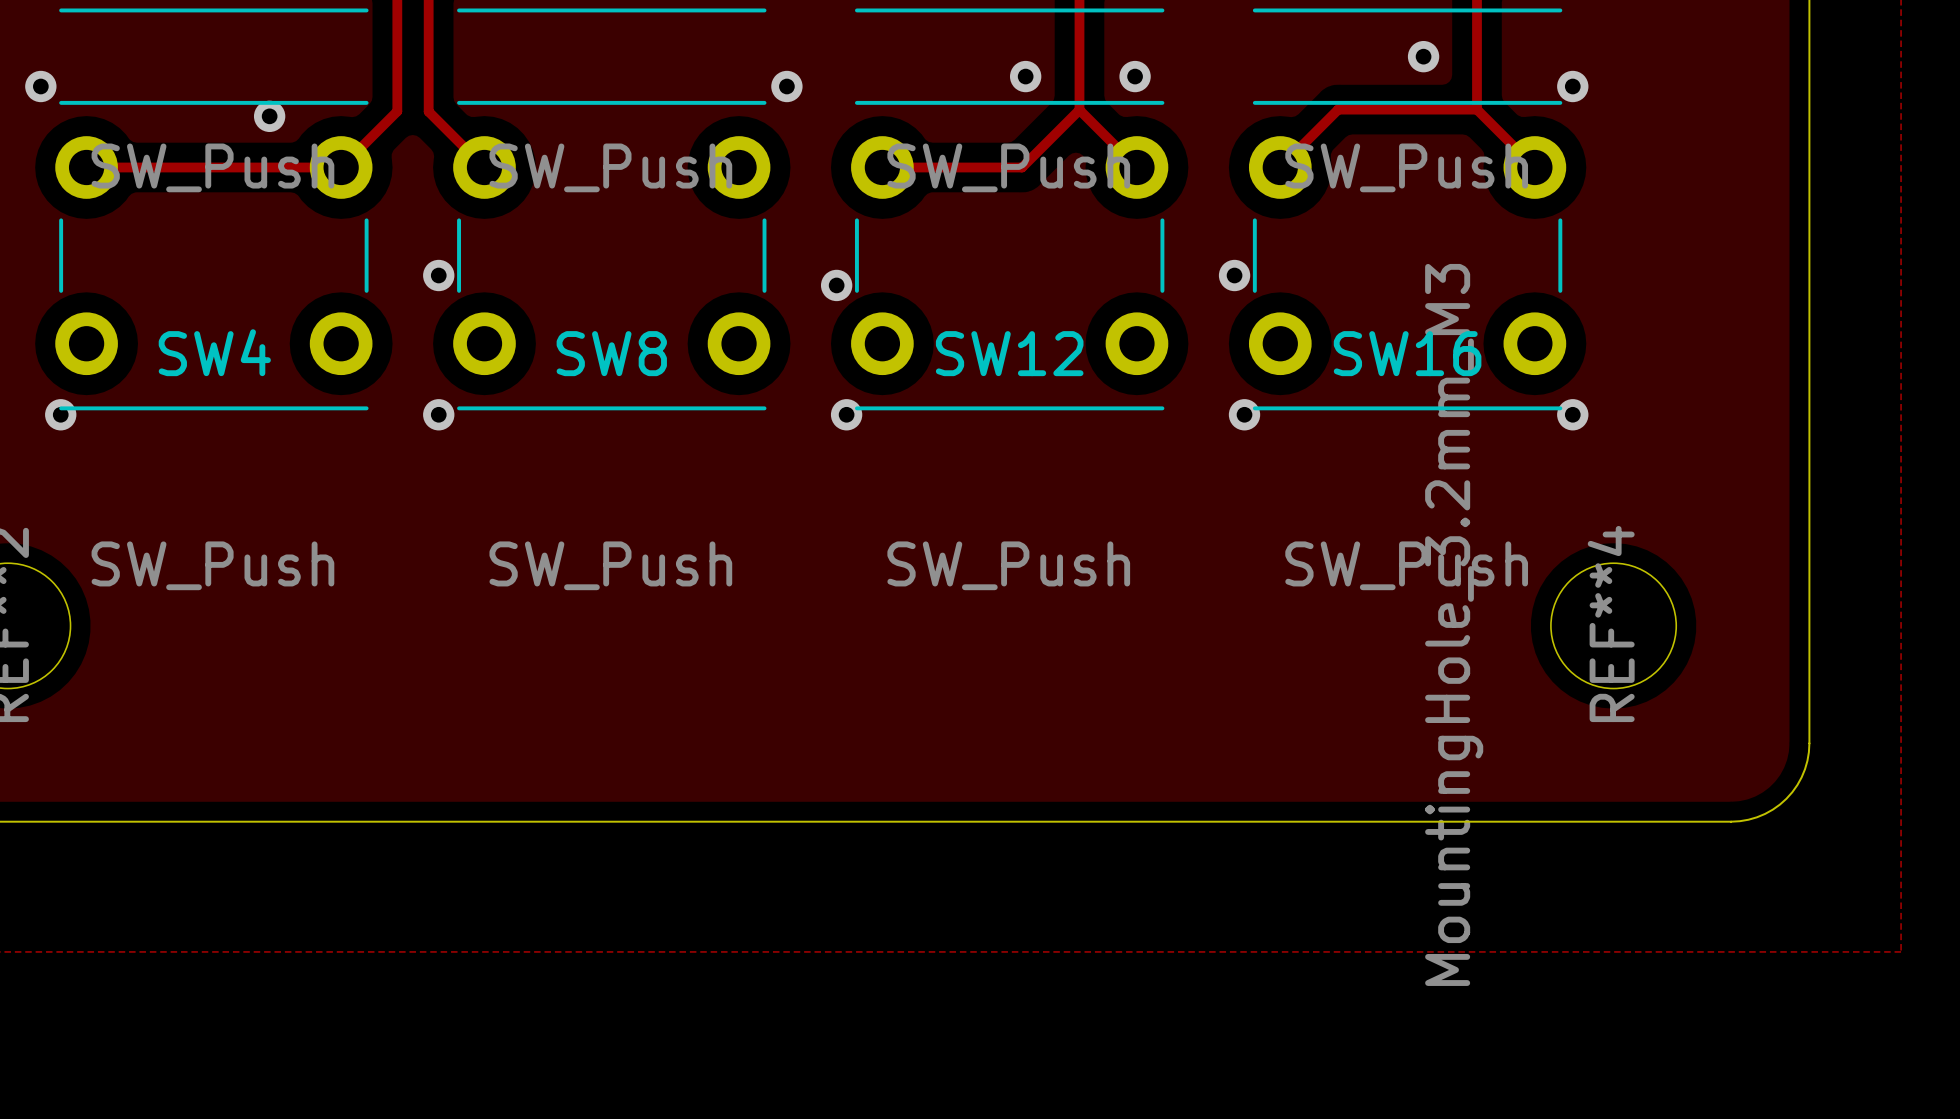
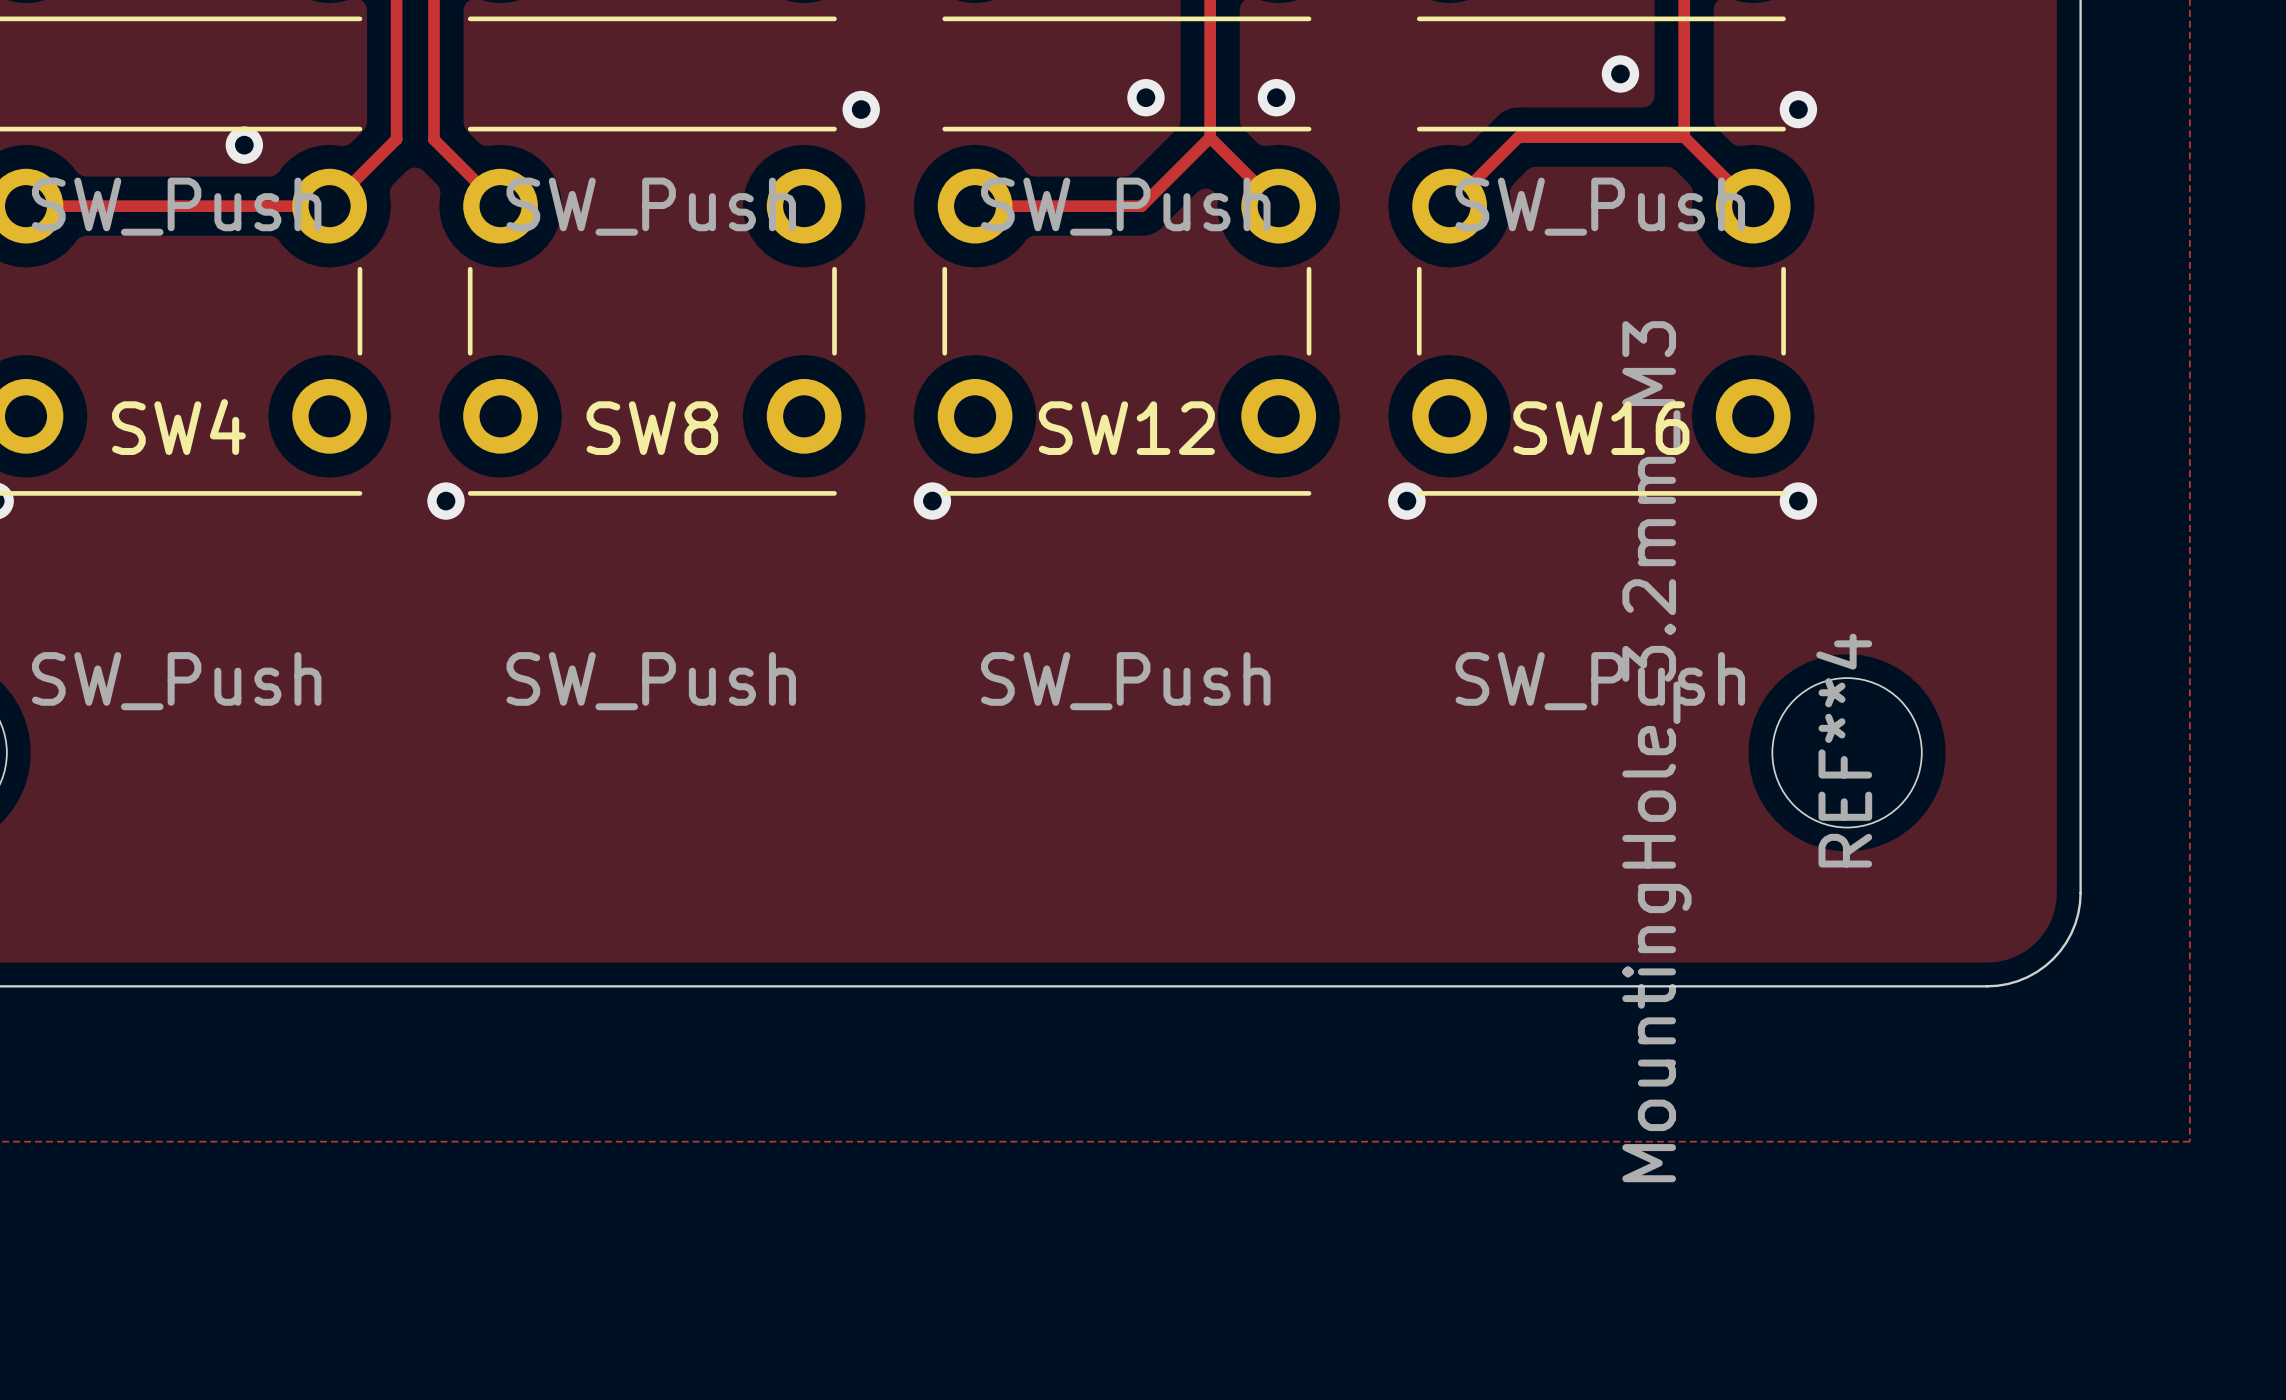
via: (438, 275) -> none
via: (1234, 275) -> none
via: (836, 285) -> none

